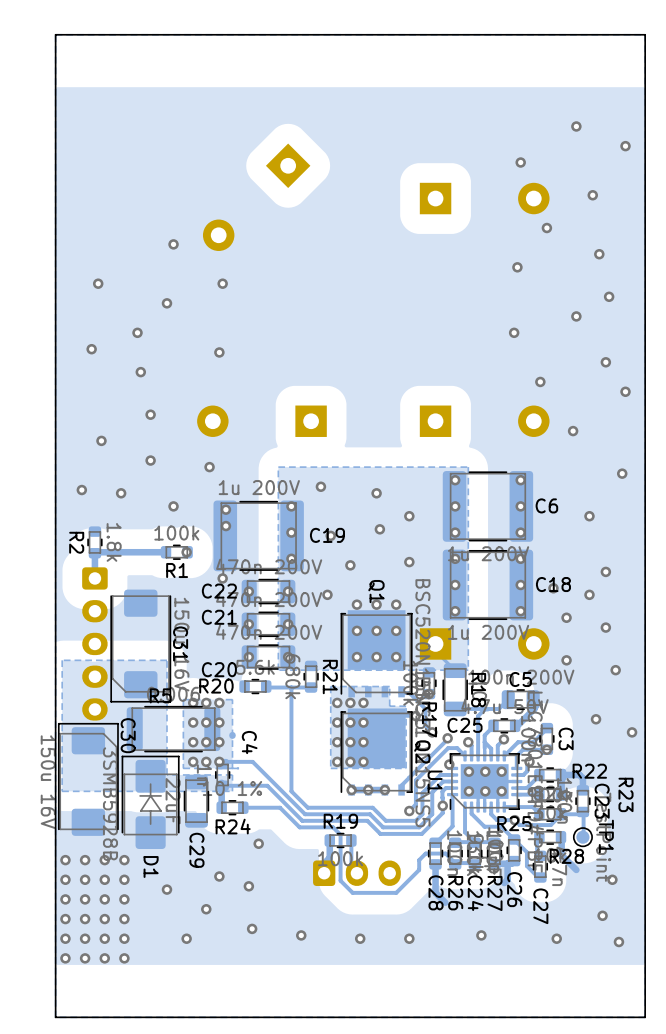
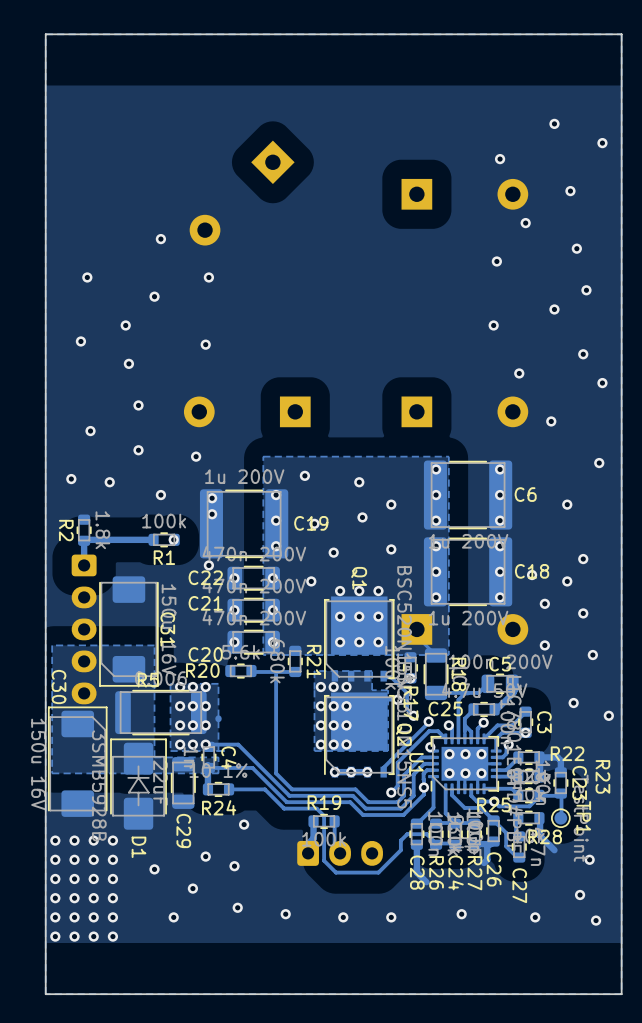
C30 name position: C30 (128, 735) -> C30 (59, 687)
C4 name position: C4 (249, 742) -> C4 (228, 757)

